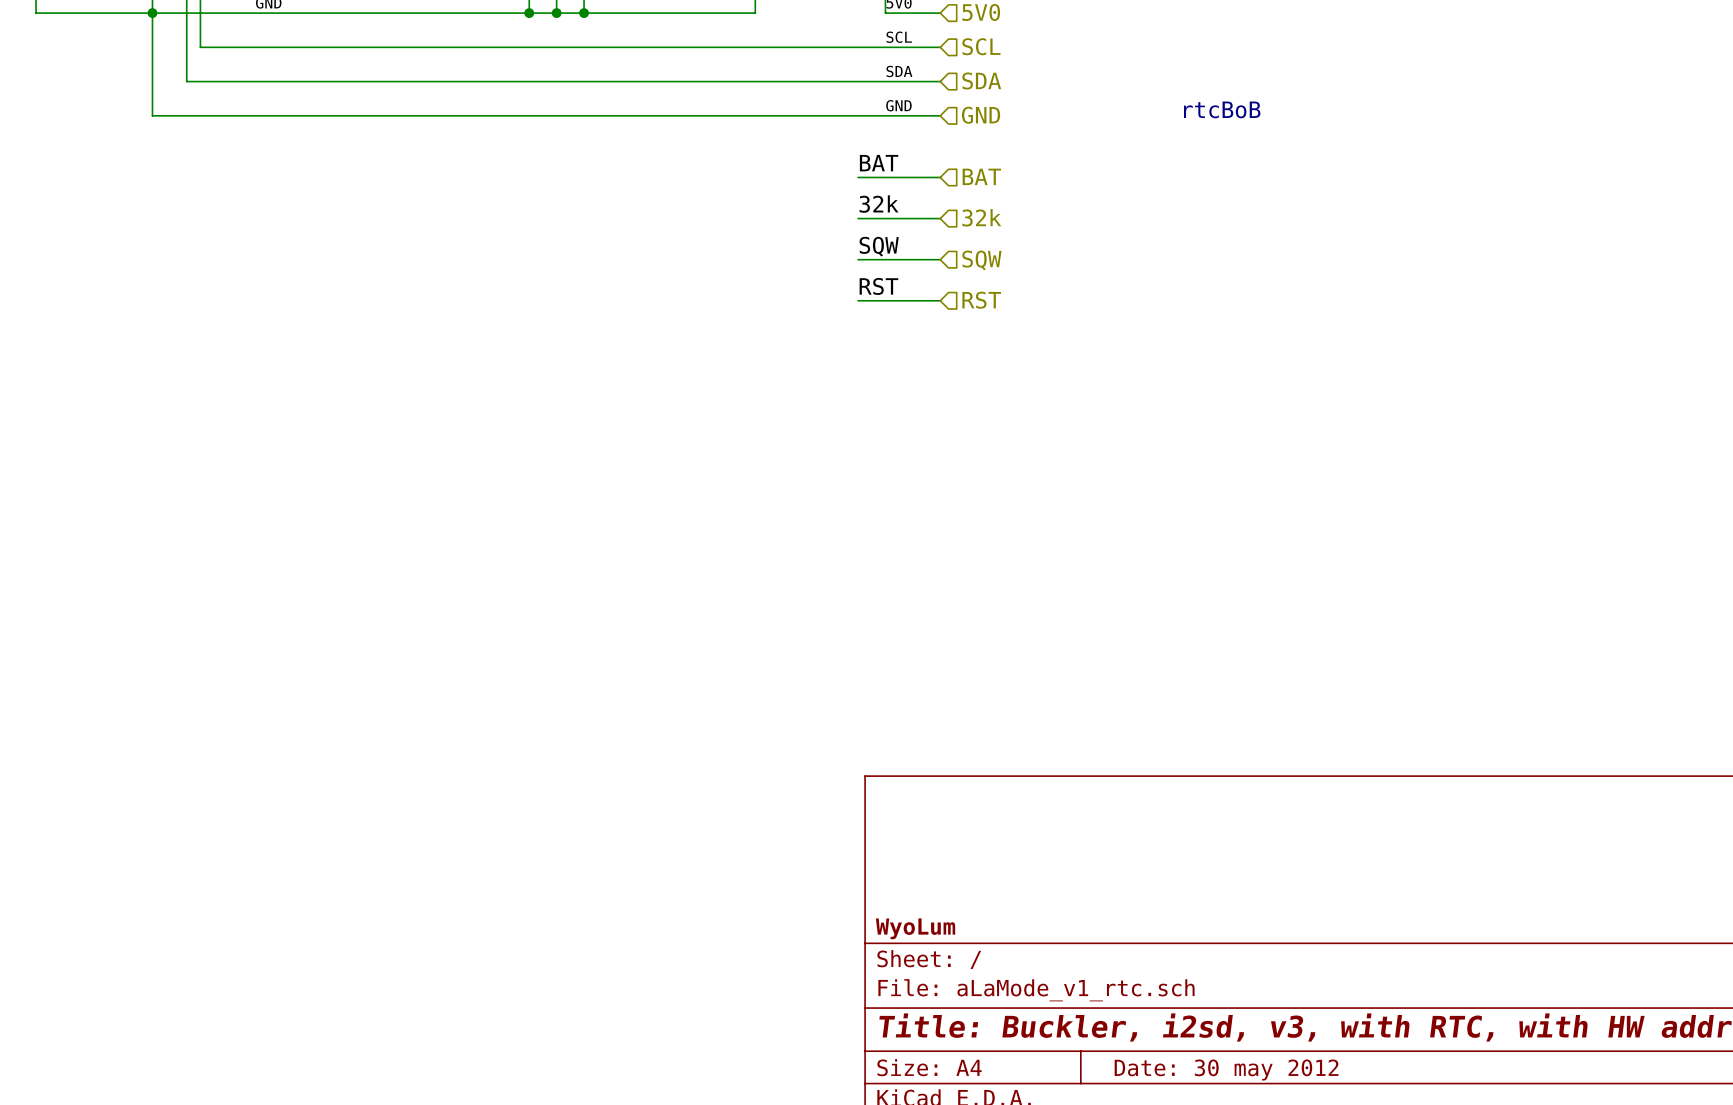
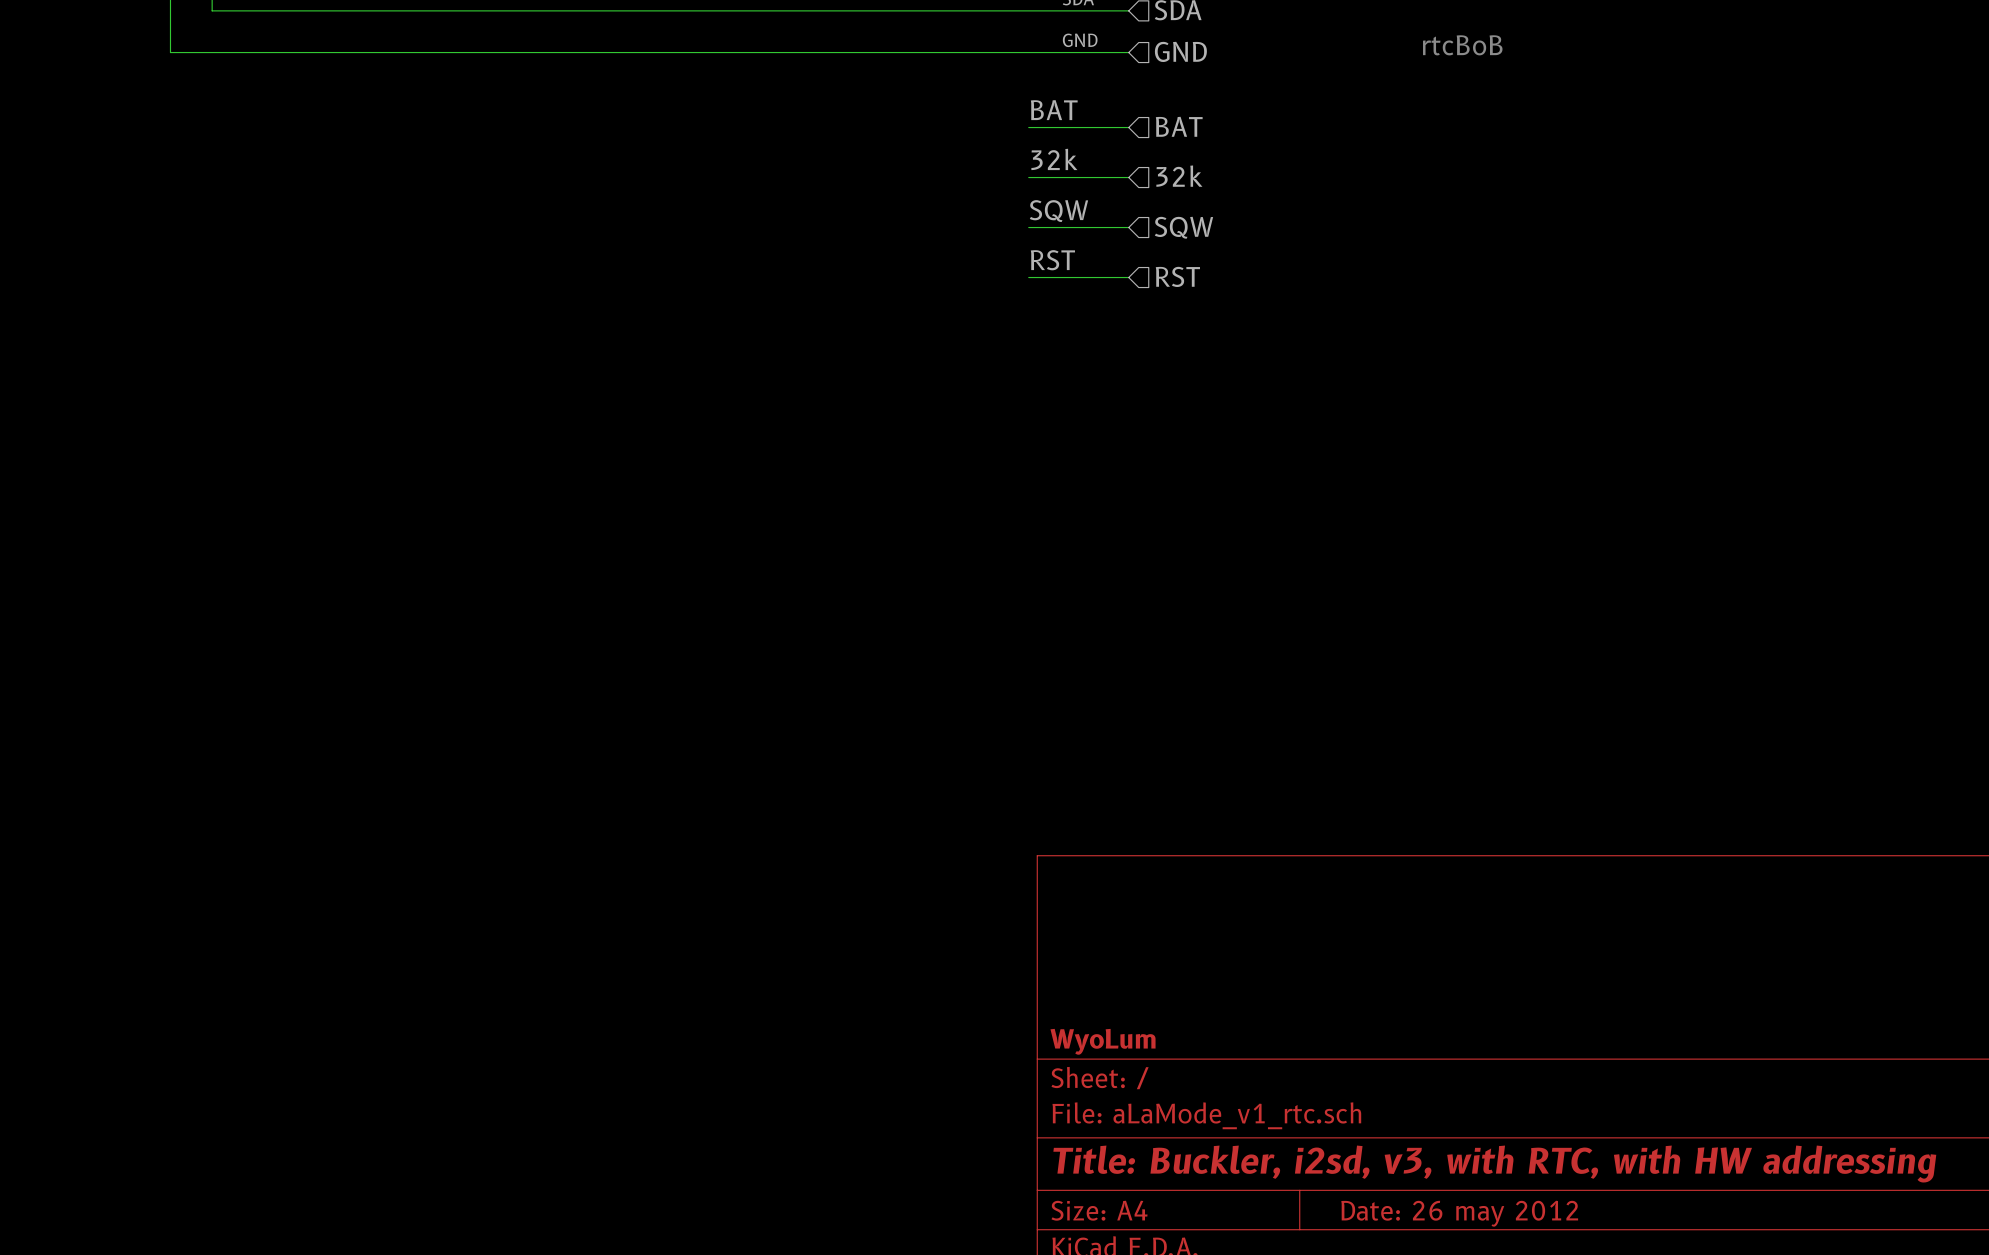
title block: Date: 30 may 2012 (1226, 1070) -> Date: 26 may 2012 (1459, 1213)

